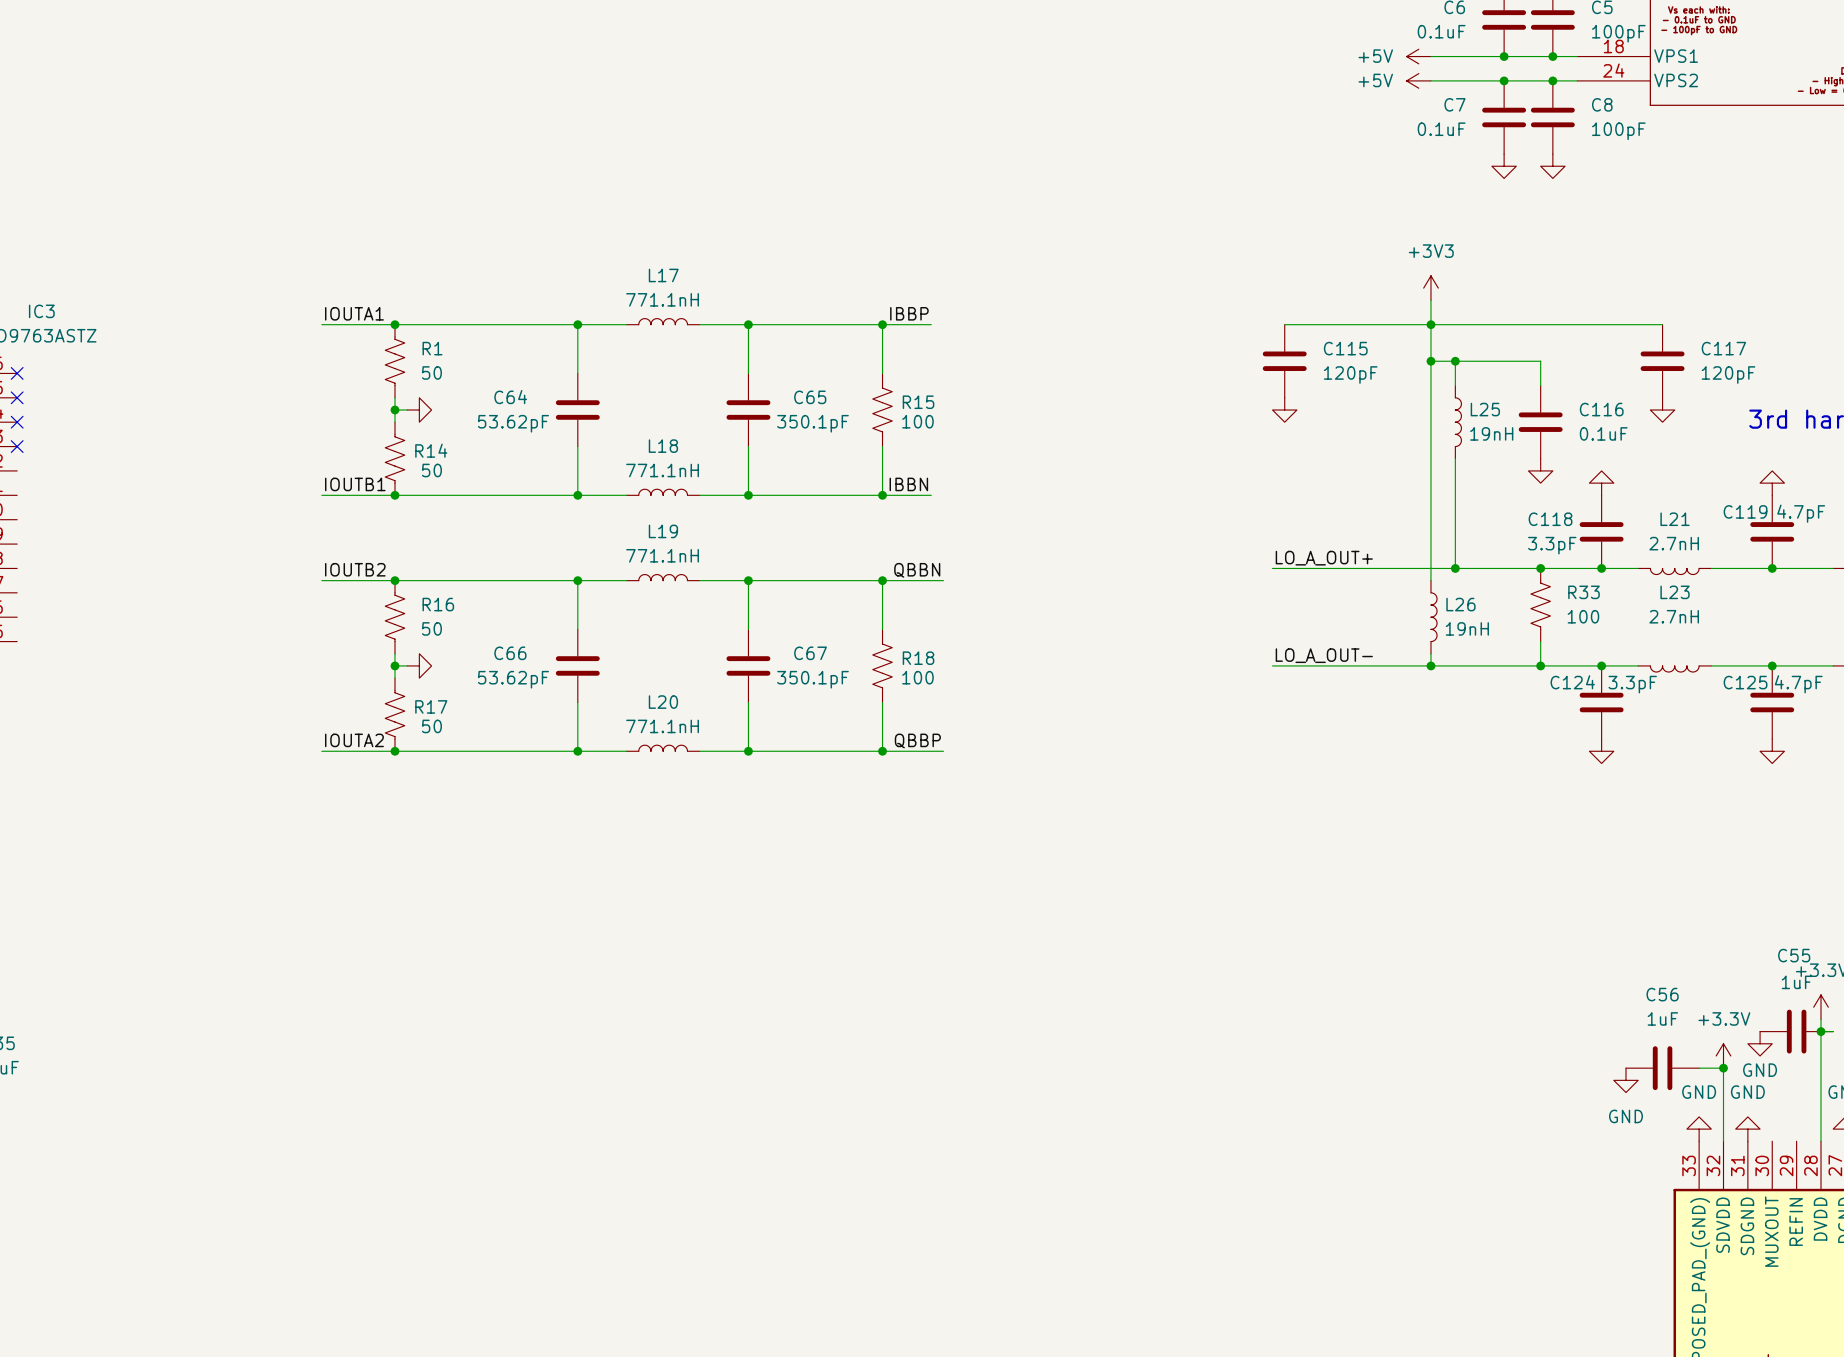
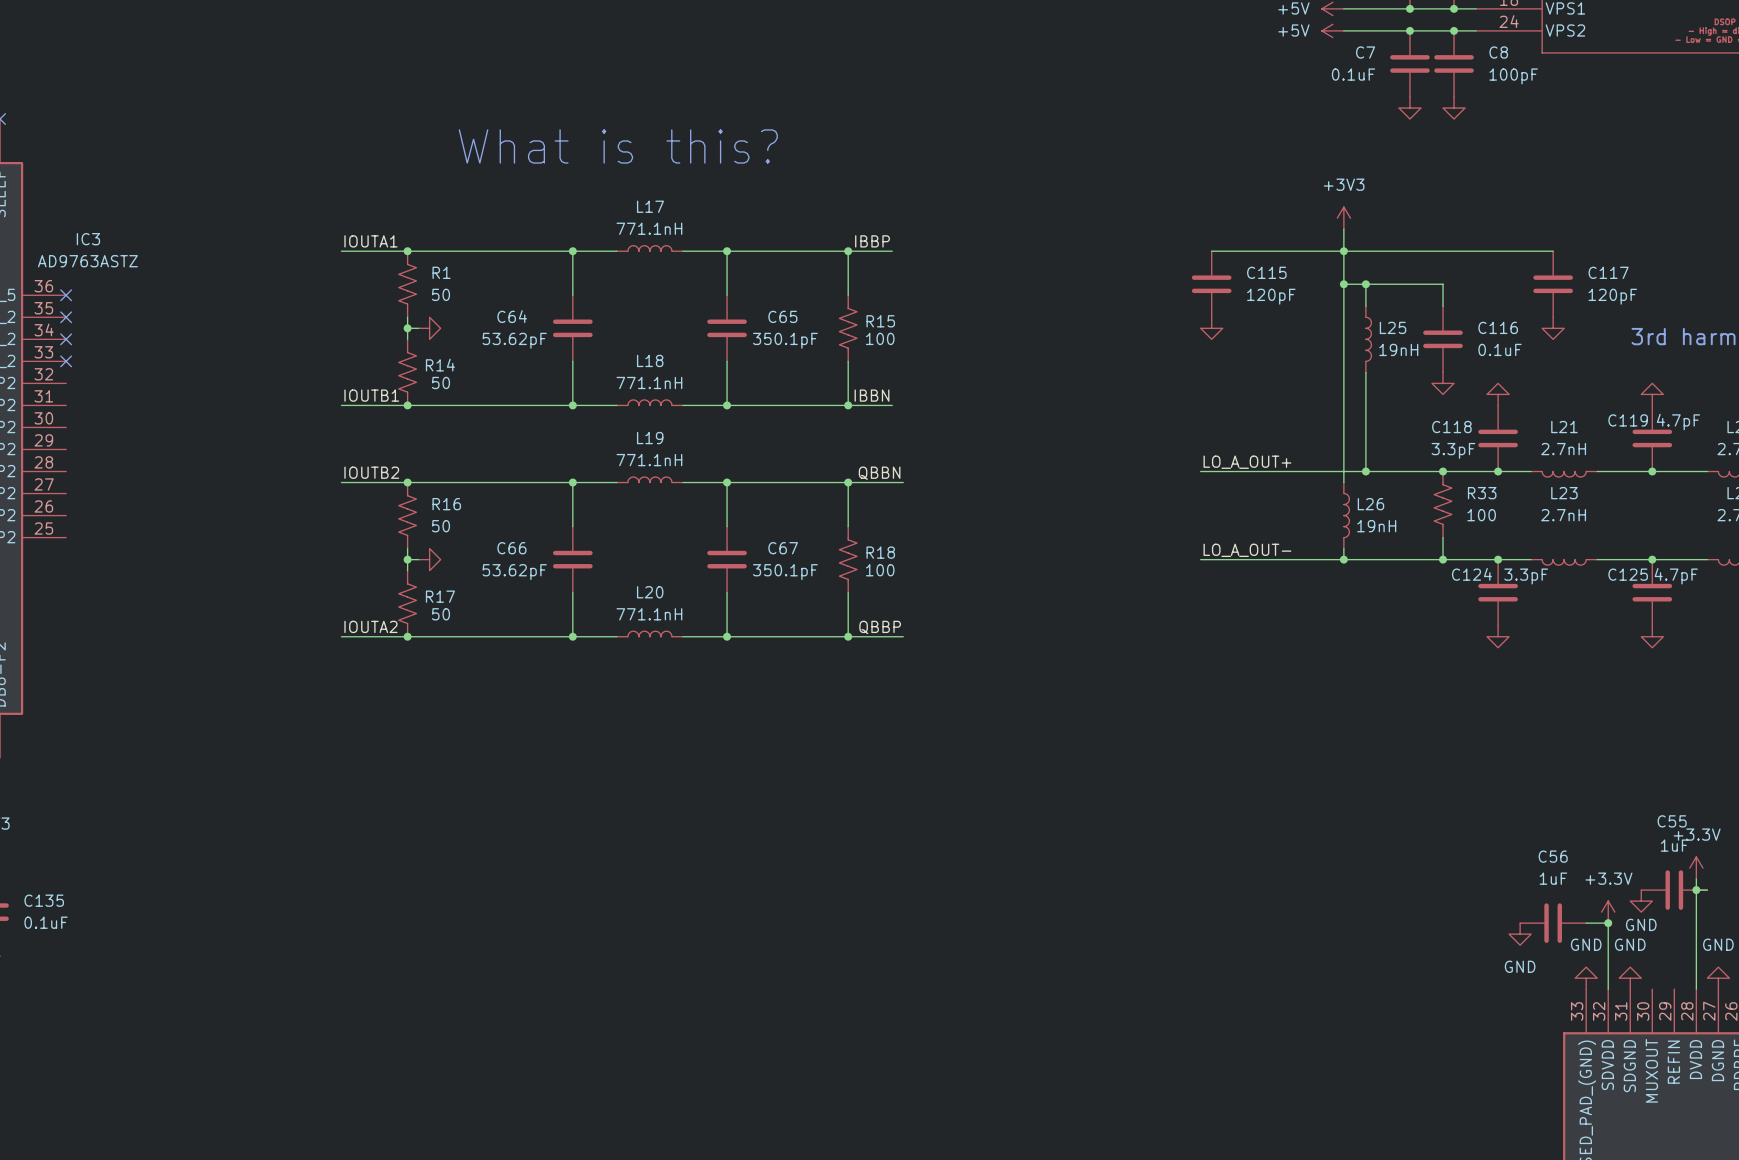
text: none -> What is this? (618, 146)

